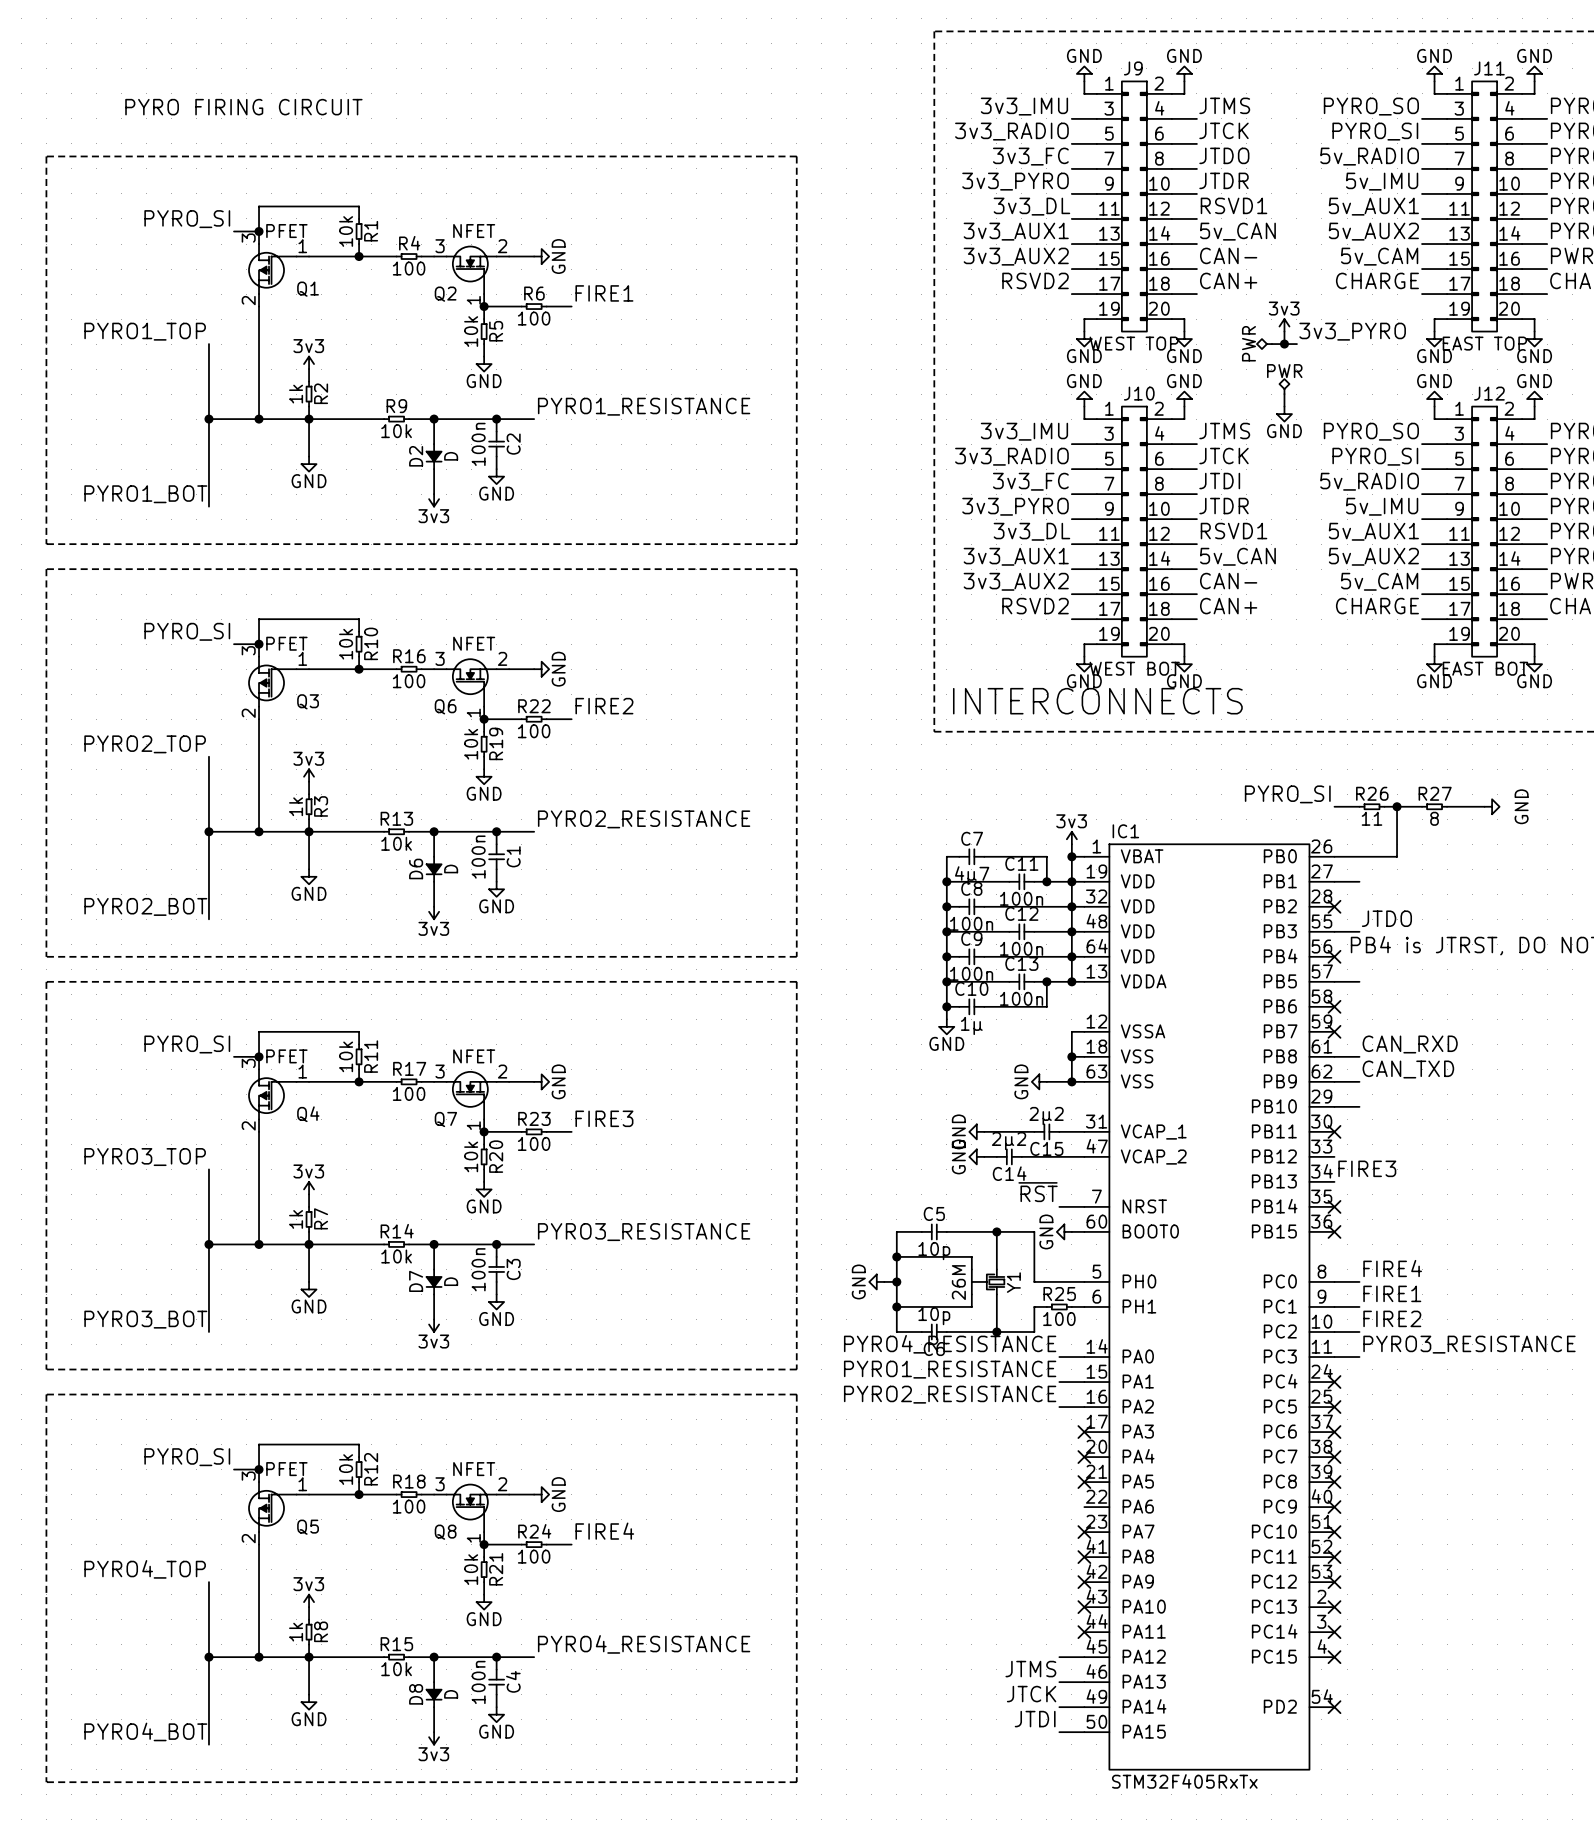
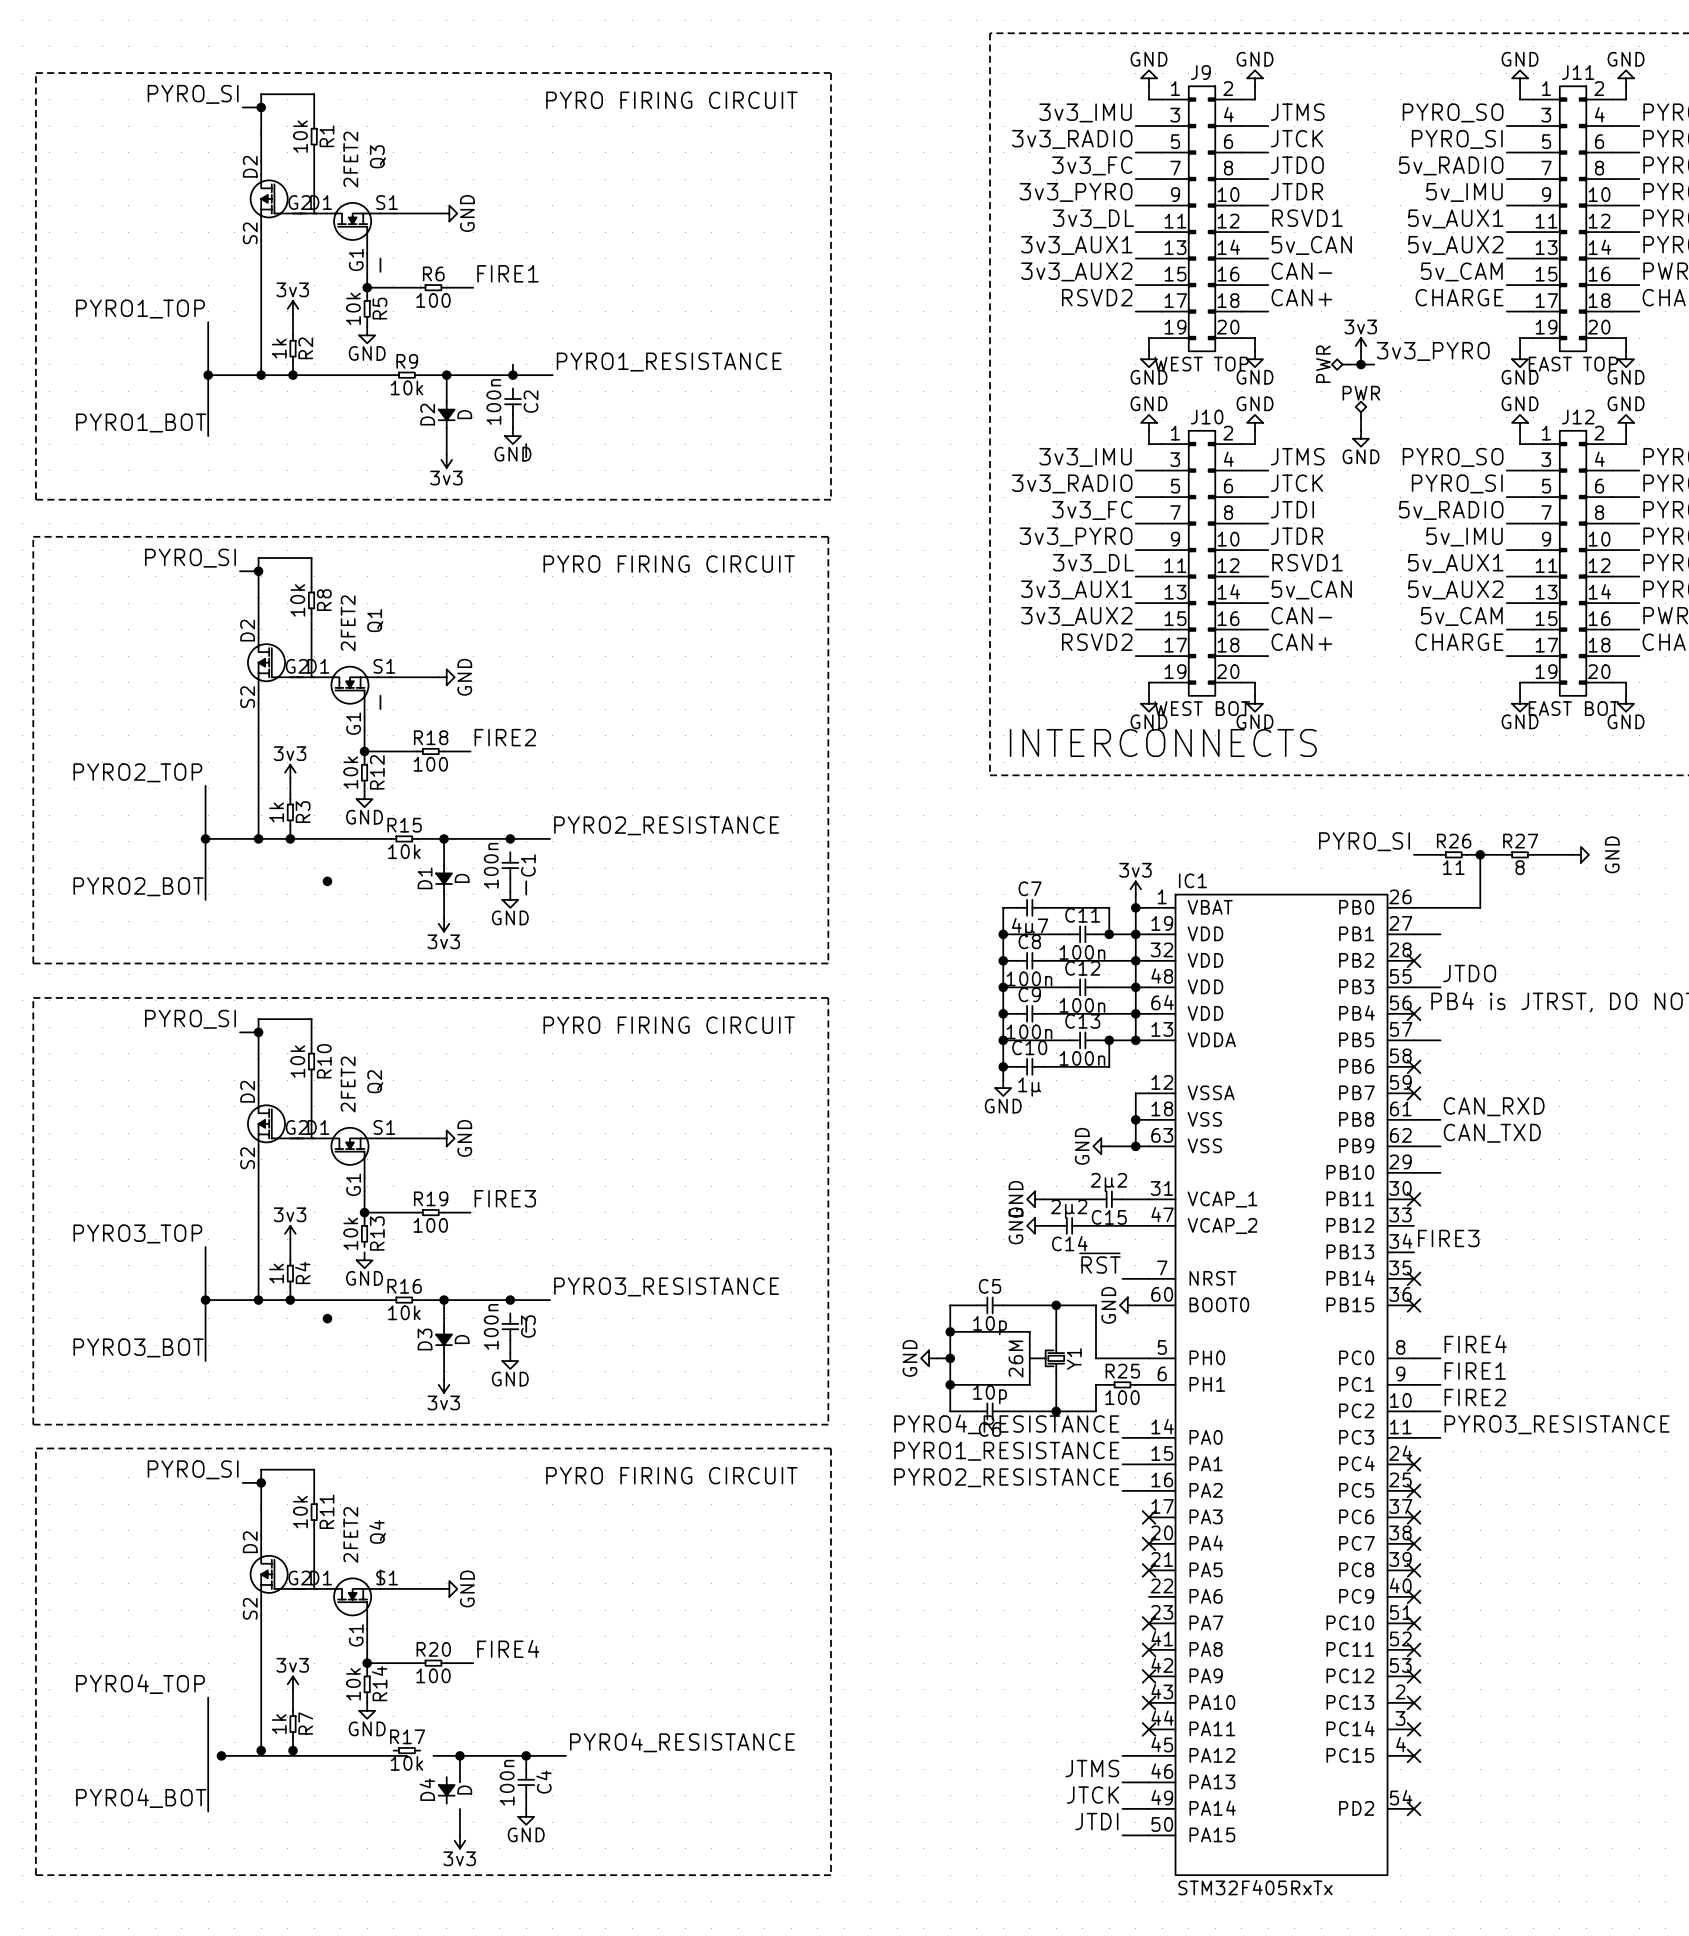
text: none -> PYRO FIRING CIRCUIT (671, 100)
wire: none -> (242, 107) (261, 107)
junction: none -> (261, 107)
text: PYRO FIRING CIRCUIT (243, 107) -> none
wire: none -> (314, 123) (314, 94) (261, 94) (261, 133)
wire: none -> (314, 149) (314, 213)
line: (46, 156) (796, 156) (796, 544) (46, 544) (46, 156) -> (35, 73) (35, 499) (830, 499) (830, 73) (35, 73)
wire: none -> (393, 213) (441, 213)
power symbol: none -> GND (449, 213)
wire: (359, 218) (359, 206) (259, 206) (259, 231) (234, 231) -> none
label position: PYRO_SI (187, 219) -> PYRO_SI (193, 94)
wire: none -> (261, 239) (261, 375)
Q1 symbol: [249, 231, 310, 307] -> [247, 597, 392, 731]
junction: (259, 231) -> none
Q1 value: PFET (286, 231) -> 2FET2 (348, 623)
R1 position: (359, 231) -> (314, 136)
Q2 value: NFET (474, 231) -> 2FET2 (348, 1084)
Q2 symbol: [434, 246, 510, 307] -> [247, 1058, 392, 1192]
wire: none -> (367, 266) (367, 295)
wire: (309, 256) (396, 256) -> none
junction position: (359, 256) -> (367, 287)
R4 rotation: 0° (409, 256) -> 90° clockwise (290, 1273)
R4 position: (409, 256) -> (290, 1273)
wire: (421, 256) (434, 256) -> none
wire: (509, 256) (534, 256) -> (446, 287) (473, 287)
power symbol: GND (541, 256) -> none
R4 value: 100 (409, 268) -> 1k (276, 1273)
wire: none -> (367, 287) (420, 287)
Q1 name position: Q1 (308, 289) -> Q1 (375, 620)
power symbol: none -> 3v3 (293, 307)
label position: FIRE1 (604, 293) -> FIRE1 (507, 273)
Q2 name position: Q2 (445, 294) -> Q2 (375, 1081)
wire: none -> (293, 314) (293, 335)
wire: none -> (208, 322) (208, 436)
wire: none -> (367, 322) (367, 327)
wire: (259, 306) (259, 419) -> none
junction: (484, 306) -> none
wire: (521, 306) (484, 306) (484, 319) -> none
R6 position: (534, 306) -> (433, 287)
wire: (546, 306) (571, 306) -> none
power symbol: none -> GND (367, 335)
label position: PYRO1_TOP (145, 331) -> PYRO1_TOP (140, 309)
R5 position: (484, 331) -> (367, 308)
wire: (208, 344) (208, 506) -> none
junction: none -> (208, 375)
junction: none -> (261, 375)
junction: none -> (293, 375)
junction: none -> (446, 375)
junction: none -> (512, 375)
power symbol: 3v3 (309, 362) -> none
power symbol: GND (484, 364) -> none
wire: (309, 369) (309, 381) -> (293, 361) (293, 375)
R2 position: (309, 394) -> (293, 348)
wire: (309, 406) (309, 456) -> none
label position: PYRO1_RESISTANCE (644, 406) -> PYRO1_RESISTANCE (669, 362)
power symbol: none -> GND (512, 436)
wire: (208, 419) (384, 419) -> (208, 375) (393, 375)
junction: (208, 419) -> none
junction: (259, 419) -> none
junction: (309, 419) -> none
R9 position: (396, 419) -> (406, 375)
wire: (409, 419) (534, 419) -> (420, 375) (552, 375)
wire: (434, 419) (434, 444) -> (446, 375) (446, 401)
junction: (434, 419) -> none
junction: (496, 419) -> none
C2 position: (496, 444) -> (512, 401)
D2 position: (434, 456) -> (446, 414)
wire: (496, 456) (496, 469) -> (512, 414) (512, 428)
power symbol: GND (309, 464) -> none
wire: (434, 469) (434, 494) -> (446, 428) (446, 454)
power symbol: GND (496, 476) -> none
label position: PYRO1_BOT (145, 494) -> PYRO1_BOT (141, 422)
power symbol position: 3v3 (434, 500) -> 3v3 (446, 461)
text: none -> PYRO FIRING CIRCUIT (669, 564)
wire: none -> (239, 571) (258, 571)
junction: none -> (258, 571)
wire: none -> (311, 587) (311, 558) (258, 558) (258, 597)
line: (46, 569) (46, 956) (796, 956) (796, 569) (46, 569) -> (33, 536) (33, 963) (828, 963) (828, 536) (33, 536)
wire: none -> (311, 613) (311, 677)
label position: PYRO_SI (187, 631) -> PYRO_SI (190, 558)
wire: (359, 631) (359, 619) (259, 619) (259, 644) (234, 644) -> none
wire: none -> (391, 677) (438, 677)
power symbol: none -> GND (446, 677)
Q3 value: PFET (286, 643) -> 2FET2 (350, 159)
Q3 symbol: [249, 644, 310, 720] -> [250, 133, 394, 267]
junction: (259, 644) -> none
R10 position: (359, 644) -> (311, 1061)
wire: none -> (258, 703) (258, 838)
wire: (309, 669) (396, 669) -> none
junction position: (359, 669) -> (364, 751)
R16 position: (409, 669) -> (404, 1300)
wire: (421, 669) (434, 669) -> none
wire: (509, 669) (534, 669) -> (444, 751) (470, 751)
power symbol: GND (541, 669) -> none
R16 value: 100 (409, 681) -> 10k (404, 1312)
wire: none -> (364, 730) (364, 759)
Q6: NFET (471, 689) -> none
Q3 name position: Q3 (308, 701) -> Q3 (377, 156)
label position: FIRE2 (604, 706) -> FIRE2 (505, 737)
wire: none -> (364, 751) (417, 751)
wire: (259, 719) (259, 831) -> none
junction: (484, 719) -> none
wire: (521, 719) (484, 719) (484, 731) -> none
R22: 100 (534, 719) -> none
wire: (546, 719) (571, 719) -> none
wire: none -> (290, 777) (290, 799)
wire: none -> (205, 785) (205, 899)
wire: none -> (364, 785) (364, 791)
label position: PYRO2_TOP (145, 744) -> PYRO2_TOP (137, 772)
R19 value: 10k (471, 744) -> 100 (430, 1225)
R19 rotation: 0° (484, 744) -> 90° clockwise (430, 1212)
R19 position: (484, 744) -> (430, 1212)
power symbol: none -> GND (364, 799)
wire: (208, 756) (208, 919) -> none
wire: (484, 756) (484, 769) -> none
power symbol position: 3v3 (309, 775) -> 3v3 (290, 771)
power symbol: GND (484, 776) -> none
wire: (309, 781) (309, 794) -> (290, 825) (290, 838)
junction: none -> (205, 838)
junction: none -> (258, 838)
junction: none -> (290, 838)
junction: none -> (444, 838)
junction: none -> (510, 838)
R3 position: (309, 806) -> (290, 812)
wire: (309, 819) (309, 869) -> none
label position: PYRO2_RESISTANCE (644, 819) -> PYRO2_RESISTANCE (666, 825)
D1: none -> D (444, 878)
wire: (208, 831) (384, 831) -> (205, 838) (391, 838)
junction: (208, 831) -> none
junction: (259, 831) -> none
R13 rotation: 0° (396, 831) -> 90° clockwise (364, 1233)
R13 position: (396, 831) -> (364, 1233)
wire: (409, 831) (534, 831) -> (417, 838) (550, 838)
wire: (434, 831) (434, 856) -> (444, 838) (444, 865)
junction: (434, 831) -> none
junction: (496, 831) -> none
power symbol: none -> GND (510, 899)
C1 position: (496, 856) -> (510, 865)
D6: D (434, 869) -> none
wire: (496, 869) (496, 881) -> (510, 878) (510, 891)
power symbol: GND (309, 876) -> none
wire: (434, 881) (434, 906) -> (444, 891) (444, 918)
power symbol: GND (496, 889) -> none
label position: PYRO2_BOT (145, 906) -> PYRO2_BOT (138, 886)
power symbol position: 3v3 (434, 913) -> 3v3 (444, 925)
text: none -> PYRO FIRING CIRCUIT (669, 1025)
wire: none -> (239, 1032) (258, 1032)
junction: none -> (258, 1032)
line: (46, 981) (46, 1369) (796, 1369) (796, 981) (46, 981) -> (33, 997) (33, 1424) (828, 1424) (828, 997) (33, 997)
wire: none -> (311, 1048) (311, 1019) (258, 1019) (258, 1058)
wire: none -> (311, 1074) (311, 1138)
label position: PYRO_SI (187, 1044) -> PYRO_SI (190, 1019)
wire: (359, 1044) (359, 1031) (259, 1031) (259, 1056) (234, 1056) -> none
Q4 symbol: [249, 1056, 310, 1132] -> [250, 1509, 394, 1642]
junction: (259, 1056) -> none
Q4 value: PFET (286, 1056) -> 2FET2 (350, 1535)
R11 position: (359, 1056) -> (314, 1512)
wire: (359, 1069) (359, 1081) -> none
wire: none -> (391, 1138) (438, 1138)
power symbol: none -> GND (446, 1138)
wire: (309, 1081) (396, 1081) -> none
junction: (359, 1081) -> none
R17 position: (409, 1081) -> (406, 1750)
wire: (421, 1081) (434, 1081) -> none
wire: (509, 1081) (534, 1081) -> (444, 1212) (470, 1212)
power symbol: GND (541, 1081) -> none
R17 value: 100 (409, 1093) -> 10k (406, 1763)
wire: none -> (258, 1164) (258, 1300)
Q7: NFET (471, 1101) -> none
Q4 name position: Q4 (308, 1114) -> Q4 (377, 1531)
label position: FIRE3 (604, 1118) -> FIRE3 (505, 1198)
wire: none -> (364, 1191) (364, 1220)
wire: (259, 1131) (259, 1244) -> none
junction: (484, 1131) -> none
wire: (521, 1131) (484, 1131) (484, 1144) -> none
R23: 100 (534, 1131) -> none
wire: (546, 1131) (571, 1131) -> none
wire: none -> (364, 1212) (417, 1212)
junction: none -> (364, 1212)
R20 value: 10k (471, 1156) -> 100 (433, 1675)
R20 rotation: 0° (484, 1156) -> 90° clockwise (433, 1663)
R20 position: (484, 1156) -> (433, 1663)
label position: PYRO3_TOP (145, 1157) -> PYRO3_TOP (137, 1233)
wire: (208, 1169) (208, 1331) -> none
wire: none -> (290, 1239) (290, 1260)
wire: (484, 1169) (484, 1181) -> none
wire: none -> (205, 1247) (205, 1361)
power symbol position: 3v3 (309, 1188) -> 3v3 (290, 1232)
power symbol: none -> GND (364, 1260)
power symbol: GND (484, 1189) -> none
wire: (309, 1194) (309, 1206) -> (290, 1286) (290, 1300)
R7 position: (309, 1219) -> (293, 1724)
junction: none -> (205, 1300)
junction: none -> (258, 1300)
junction: none -> (290, 1300)
wire: (309, 1231) (309, 1281) -> none
label position: PYRO3_RESISTANCE (644, 1232) -> PYRO3_RESISTANCE (666, 1286)
wire: (208, 1244) (384, 1244) -> (205, 1300) (391, 1300)
junction: (208, 1244) -> none
junction: (259, 1244) -> none
R14 rotation: 0° (396, 1244) -> 90° clockwise (367, 1684)
R14 position: (396, 1244) -> (367, 1684)
wire: (409, 1244) (534, 1244) -> (417, 1300) (550, 1300)
wire: (434, 1244) (434, 1269) -> (444, 1300) (444, 1326)
junction position: (434, 1244) -> (444, 1300)
junction position: (496, 1244) -> (510, 1300)
D3: none -> D (444, 1339)
C3 position: (496, 1269) -> (510, 1326)
D7: D (434, 1281) -> none
wire: (496, 1281) (496, 1294) -> (510, 1339) (510, 1353)
power symbol: GND (309, 1289) -> none
wire: (434, 1294) (434, 1319) -> (444, 1353) (444, 1379)
power symbol position: GND (496, 1301) -> GND (510, 1361)
label position: PYRO3_BOT (145, 1319) -> PYRO3_BOT (138, 1347)
power symbol position: 3v3 (434, 1325) -> 3v3 (444, 1386)
text: none -> PYRO FIRING CIRCUIT (671, 1475)
line: (46, 1394) (46, 1782) (796, 1782) (796, 1394) (46, 1394) -> (35, 1448) (35, 1875) (830, 1875) (830, 1448) (35, 1448)
wire: none -> (242, 1482) (261, 1482)
junction: none -> (261, 1482)
wire: none -> (314, 1498) (314, 1469) (261, 1469) (261, 1509)
wire: none -> (314, 1525) (314, 1588)
label position: PYRO_SI (187, 1457) -> PYRO_SI (193, 1469)
wire: (359, 1457) (359, 1444) (259, 1444) (259, 1469) (234, 1469) -> none
junction: (259, 1469) -> none
R12 position: (359, 1469) -> (364, 772)
wire: (309, 1494) (396, 1494) -> none
junction: (359, 1494) -> none
R18 position: (409, 1494) -> (430, 751)
wire: (421, 1494) (434, 1494) -> none
wire: (509, 1494) (534, 1494) -> (446, 1663) (473, 1663)
power symbol: GND (541, 1494) -> none
wire: none -> (393, 1588) (441, 1588)
power symbol: none -> GND (449, 1588)
Q5: PFET (279, 1507) -> none
Q8: NFET (471, 1514) -> none
wire: none -> (261, 1615) (261, 1750)
label position: FIRE4 (604, 1531) -> FIRE4 (508, 1648)
wire: (259, 1544) (259, 1657) -> none
junction: (484, 1544) -> none
wire: (521, 1544) (484, 1544) (484, 1557) -> none
R24: 100 (534, 1544) -> none
wire: (546, 1544) (571, 1544) -> none
wire: none -> (367, 1641) (367, 1671)
label position: PYRO4_TOP (145, 1569) -> PYRO4_TOP (140, 1684)
wire: none -> (367, 1663) (420, 1663)
junction: none -> (367, 1663)
R21: 10k (484, 1569) -> none
wire: (208, 1582) (208, 1744) -> none
wire: (484, 1582) (484, 1594) -> none
wire: none -> (293, 1689) (293, 1710)
power symbol position: 3v3 (309, 1600) -> 3v3 (293, 1683)
wire: none -> (208, 1697) (208, 1811)
wire: none -> (367, 1697) (367, 1702)
power symbol: GND (484, 1602) -> none
wire: (309, 1607) (309, 1619) -> (293, 1737) (293, 1750)
power symbol: none -> GND (367, 1710)
R8 value: 1k (296, 1632) -> 10k (297, 600)
R8 position: (309, 1632) -> (311, 600)
wire: (309, 1644) (309, 1694) -> none
junction: none -> (261, 1750)
junction: none -> (293, 1750)
junction: (259, 1657) -> none
junction: (309, 1657) -> none
R15 position: (396, 1657) -> (404, 838)
D4: none -> D (446, 1790)
D8: D (434, 1694) -> none
power symbol: GND (309, 1702) -> none
label position: PYRO4_BOT (145, 1731) -> PYRO4_BOT (141, 1798)

